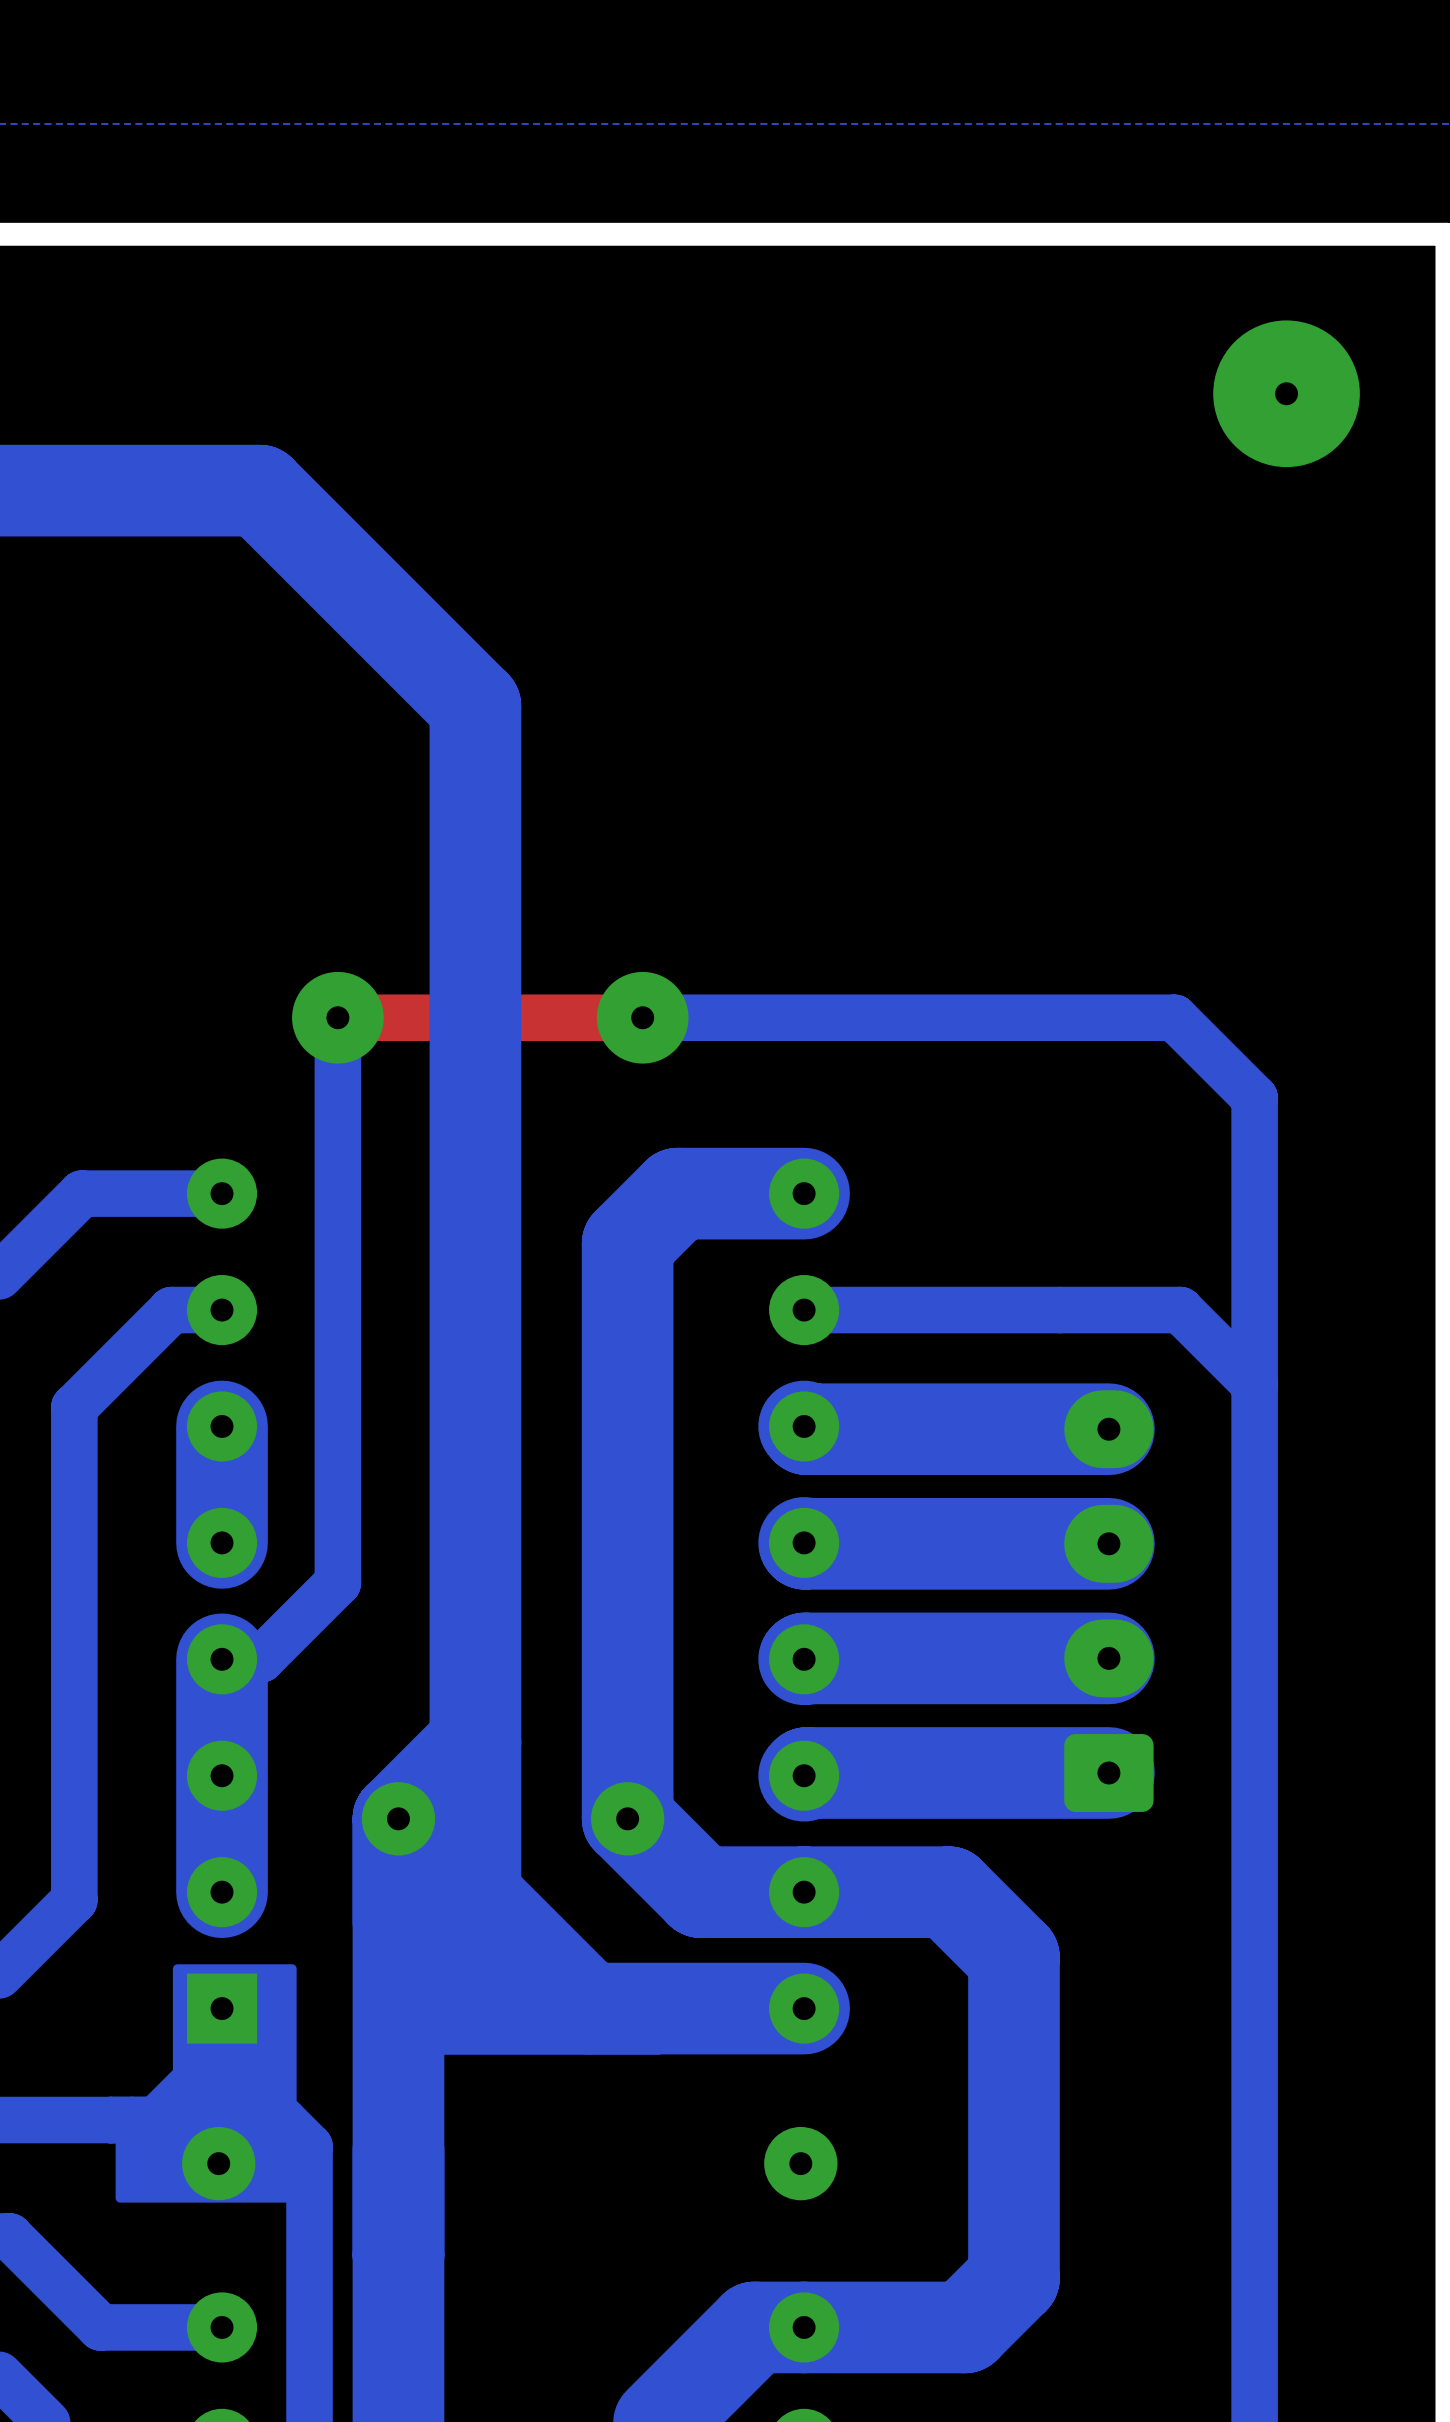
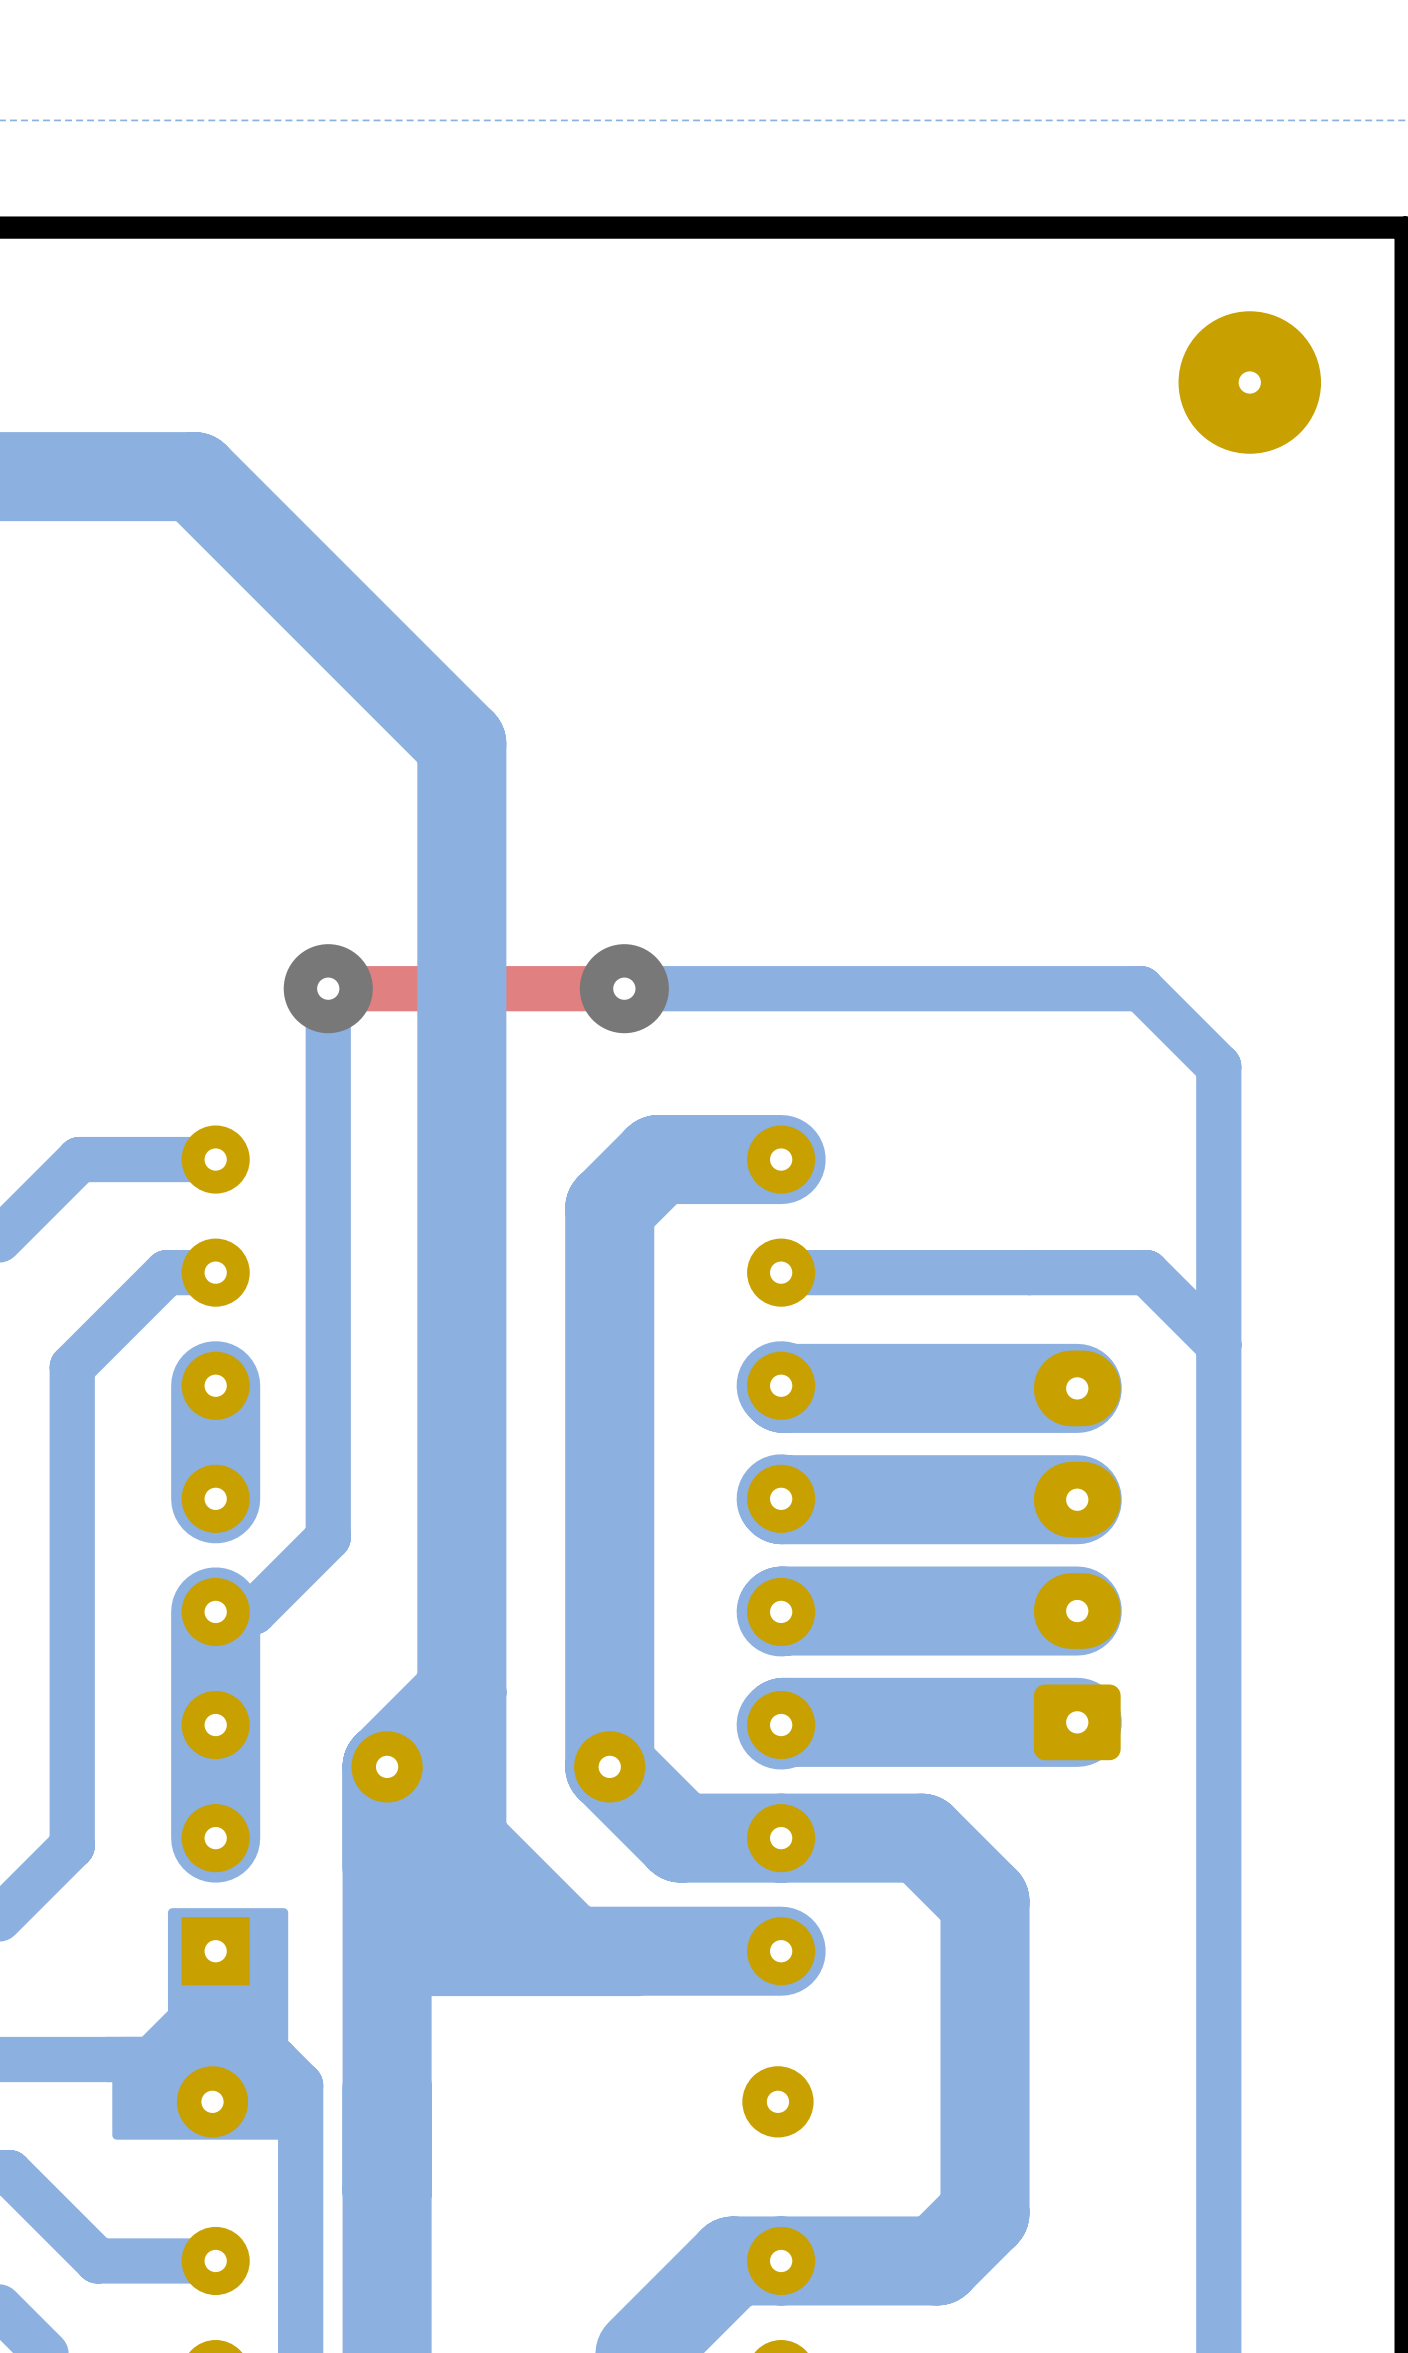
bottom track: (200, 490) (259, 490) (475, 706) (475, 765) -> (194, 476) (461, 743)

